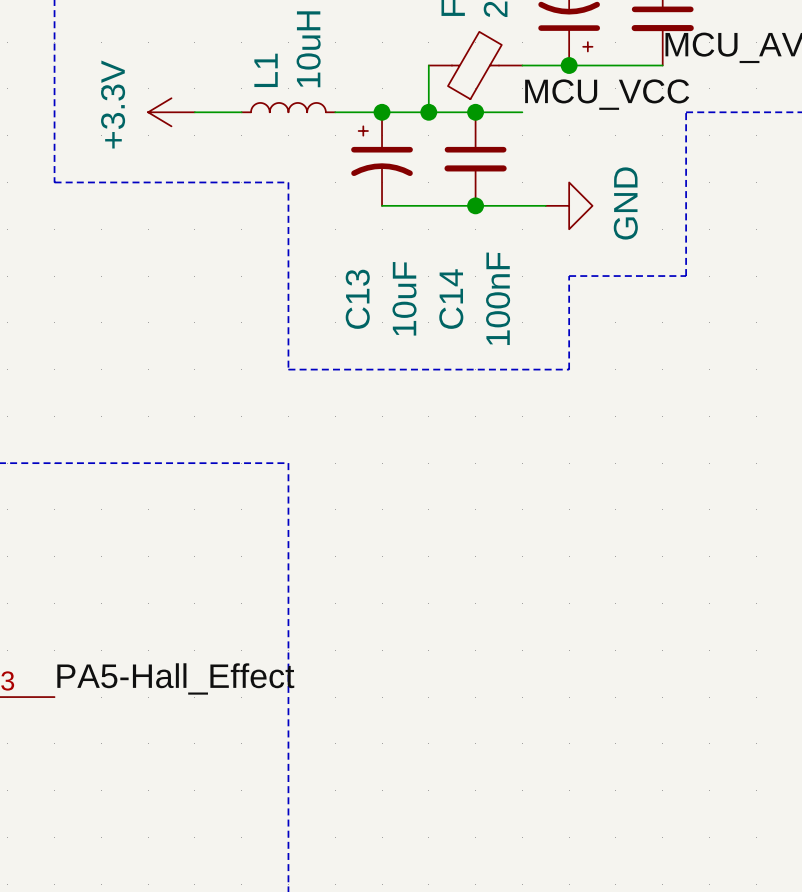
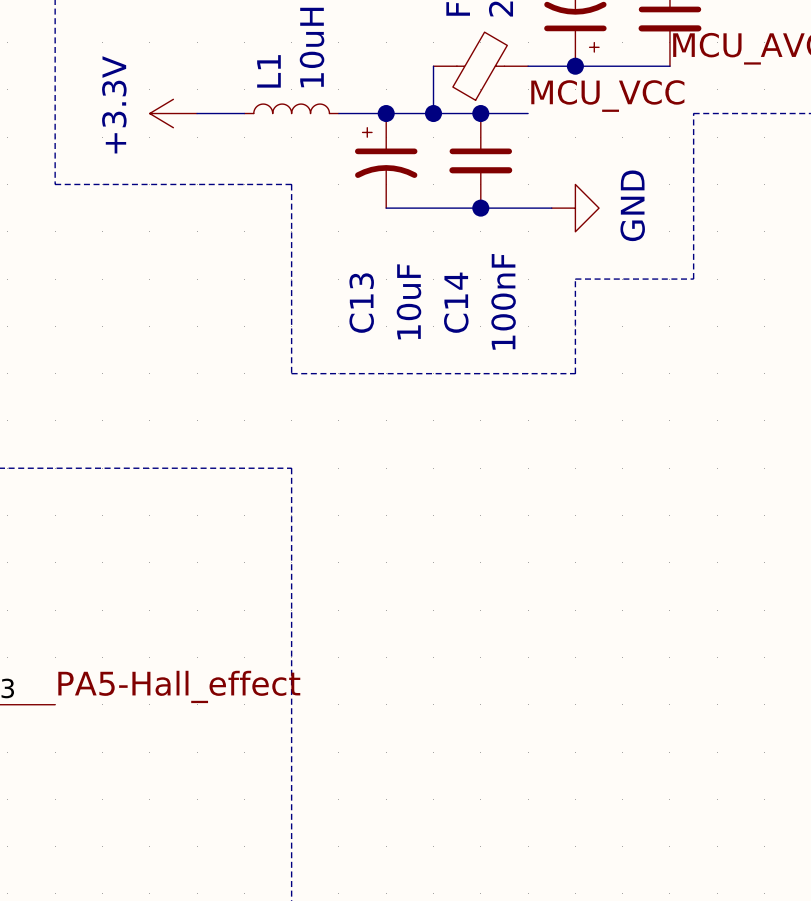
label: PA5-Hall_Effect (175, 678) -> PA5-Hall_effect (179, 686)

